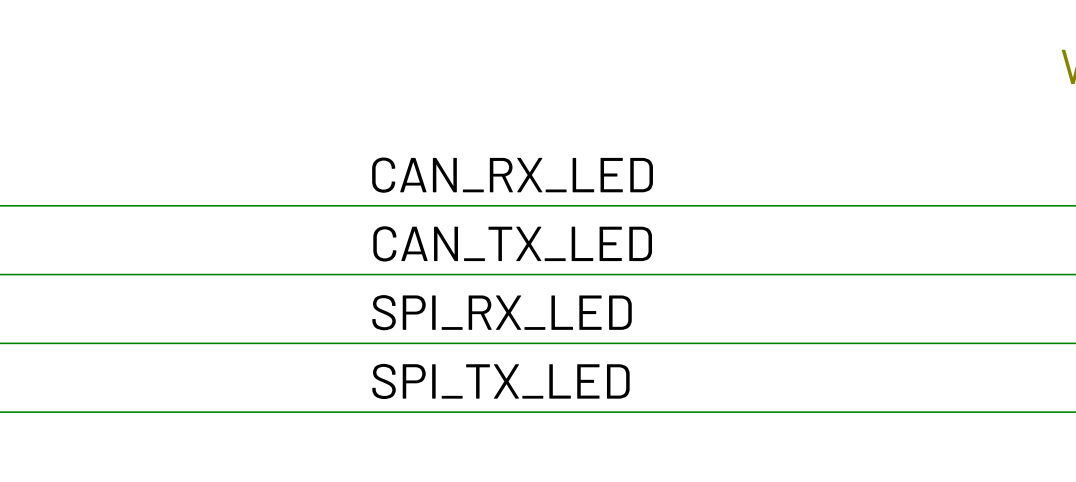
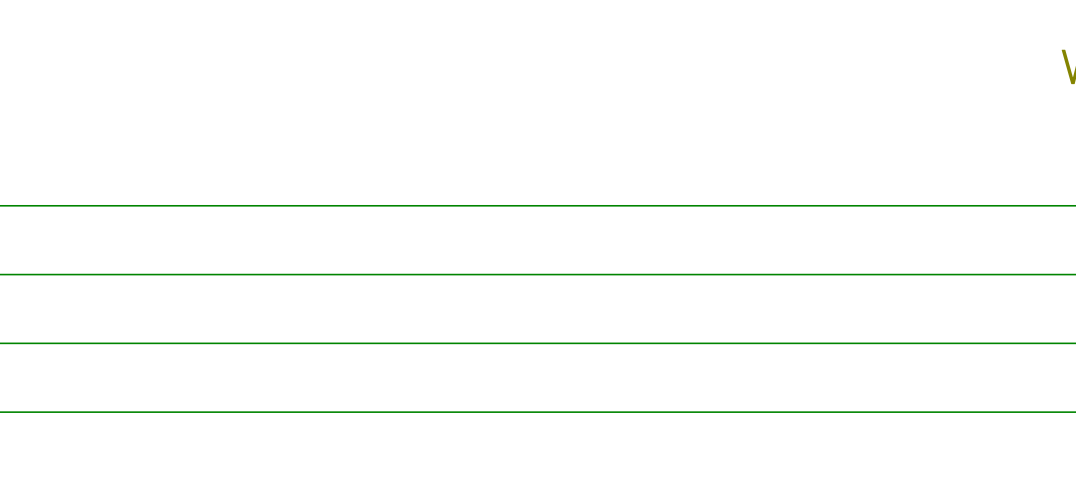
label: CAN_RX_LED (512, 175) -> none
label: CAN_TX_LED (512, 243) -> none
label: SPI_RX_LED (502, 312) -> none
label: SPI_TX_LED (500, 381) -> none

